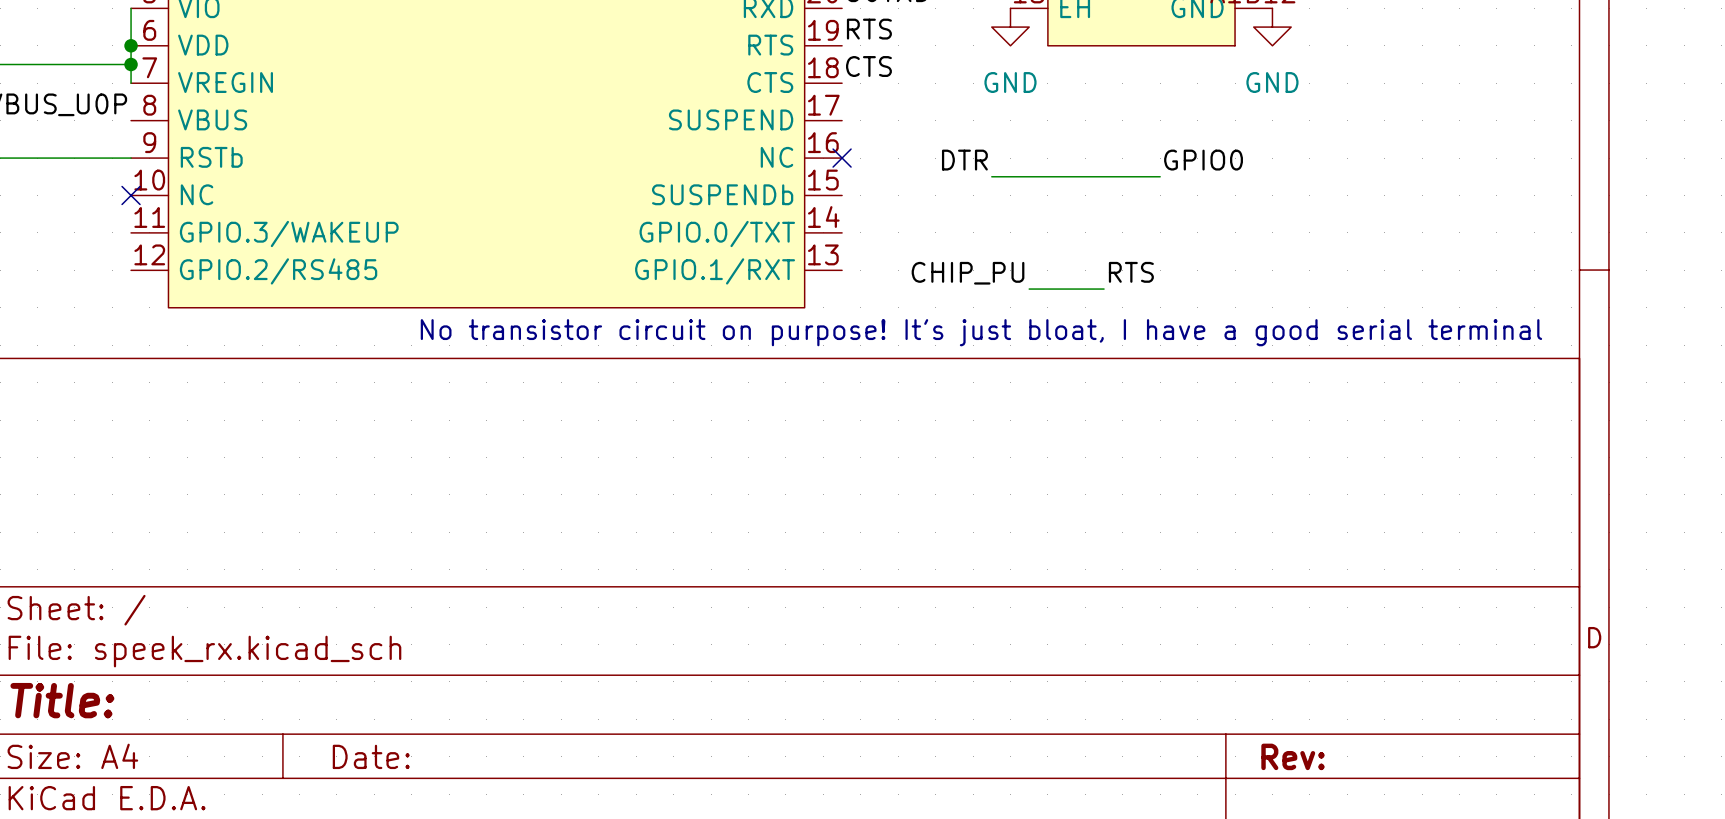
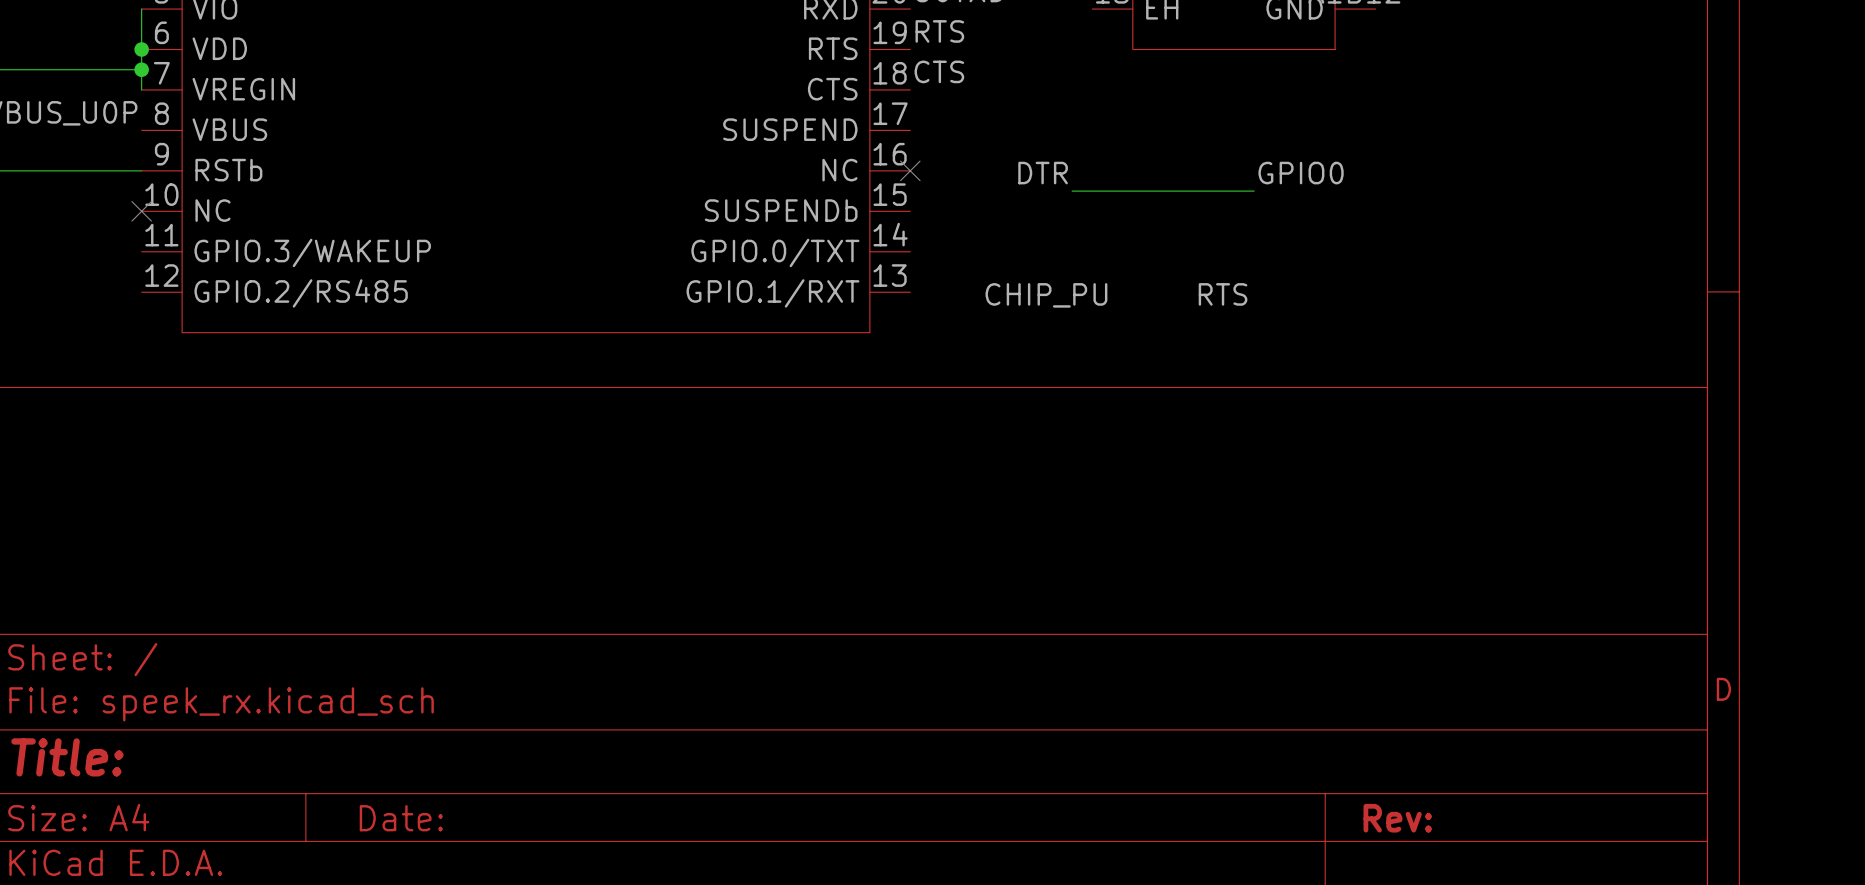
power symbol: GND (1010, 27) -> none
power symbol: GND (1272, 27) -> none
wire: (1029, 289) (1104, 289) -> none
text: No transistor circuit on purpose! It's just bloat, I have a good serial terminal (981, 332) -> none

